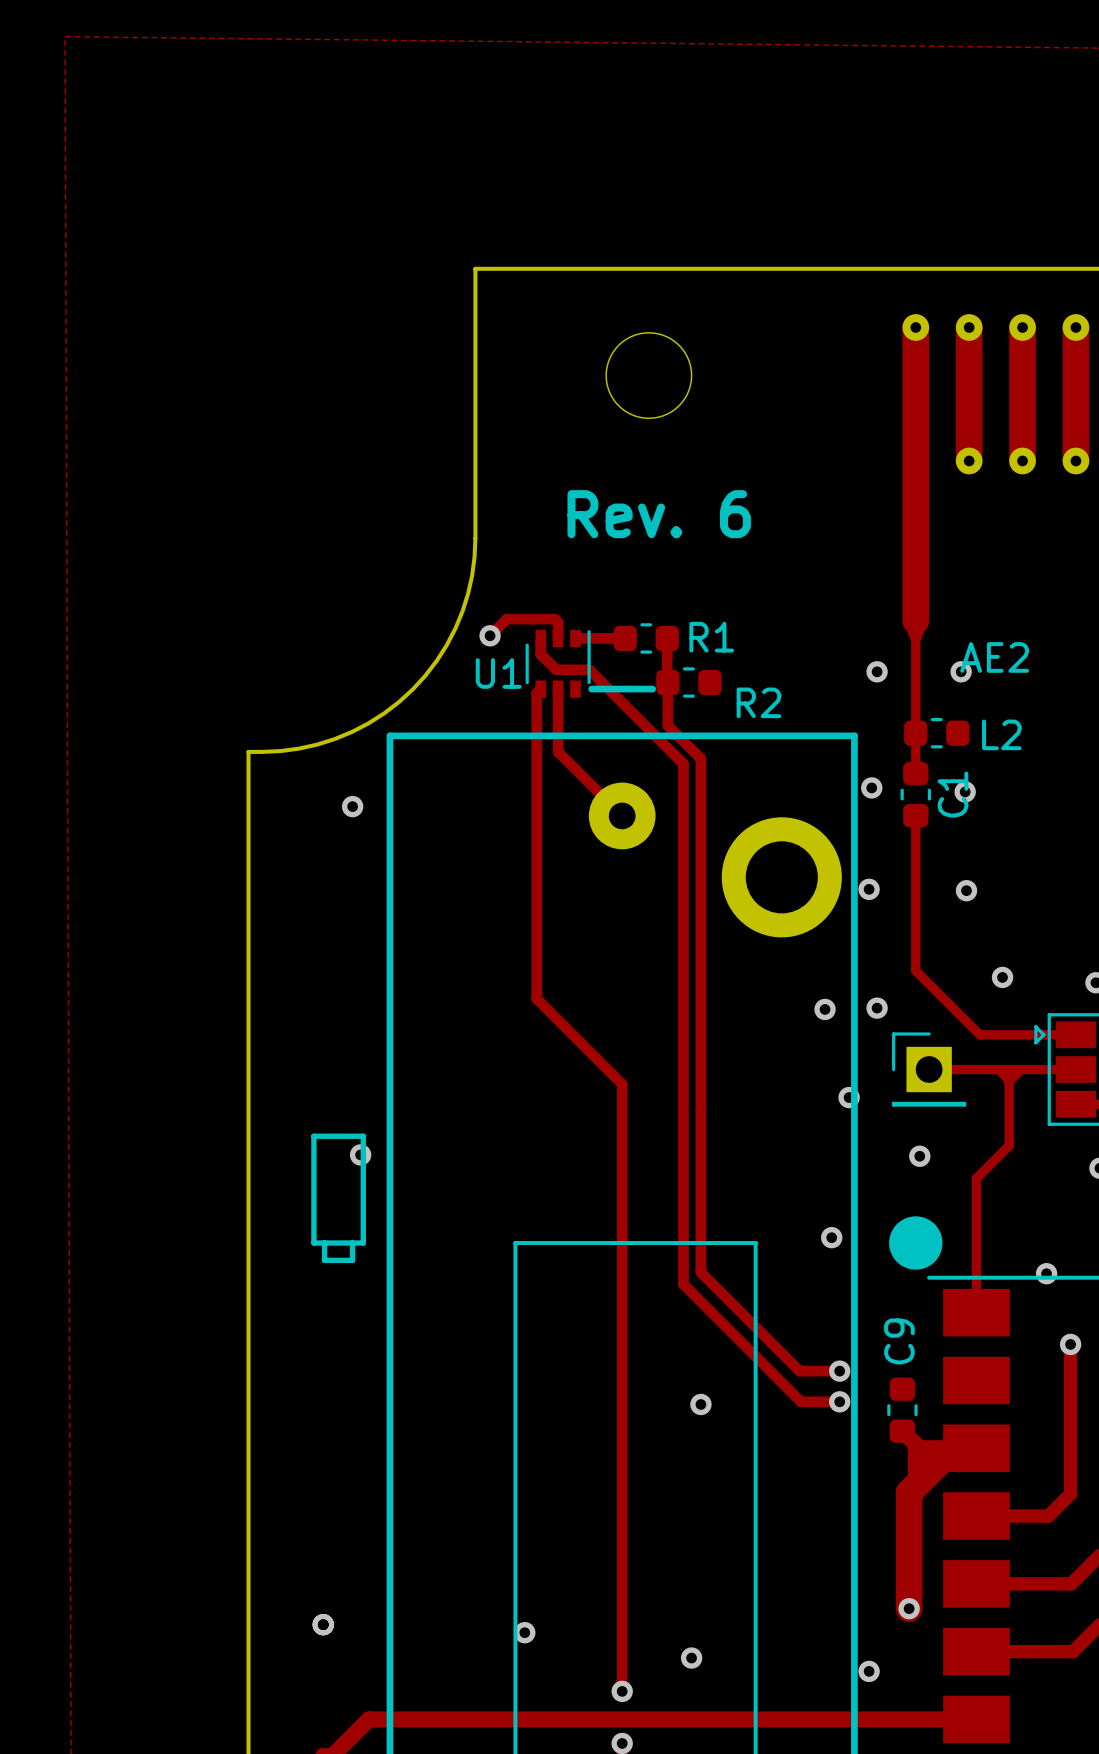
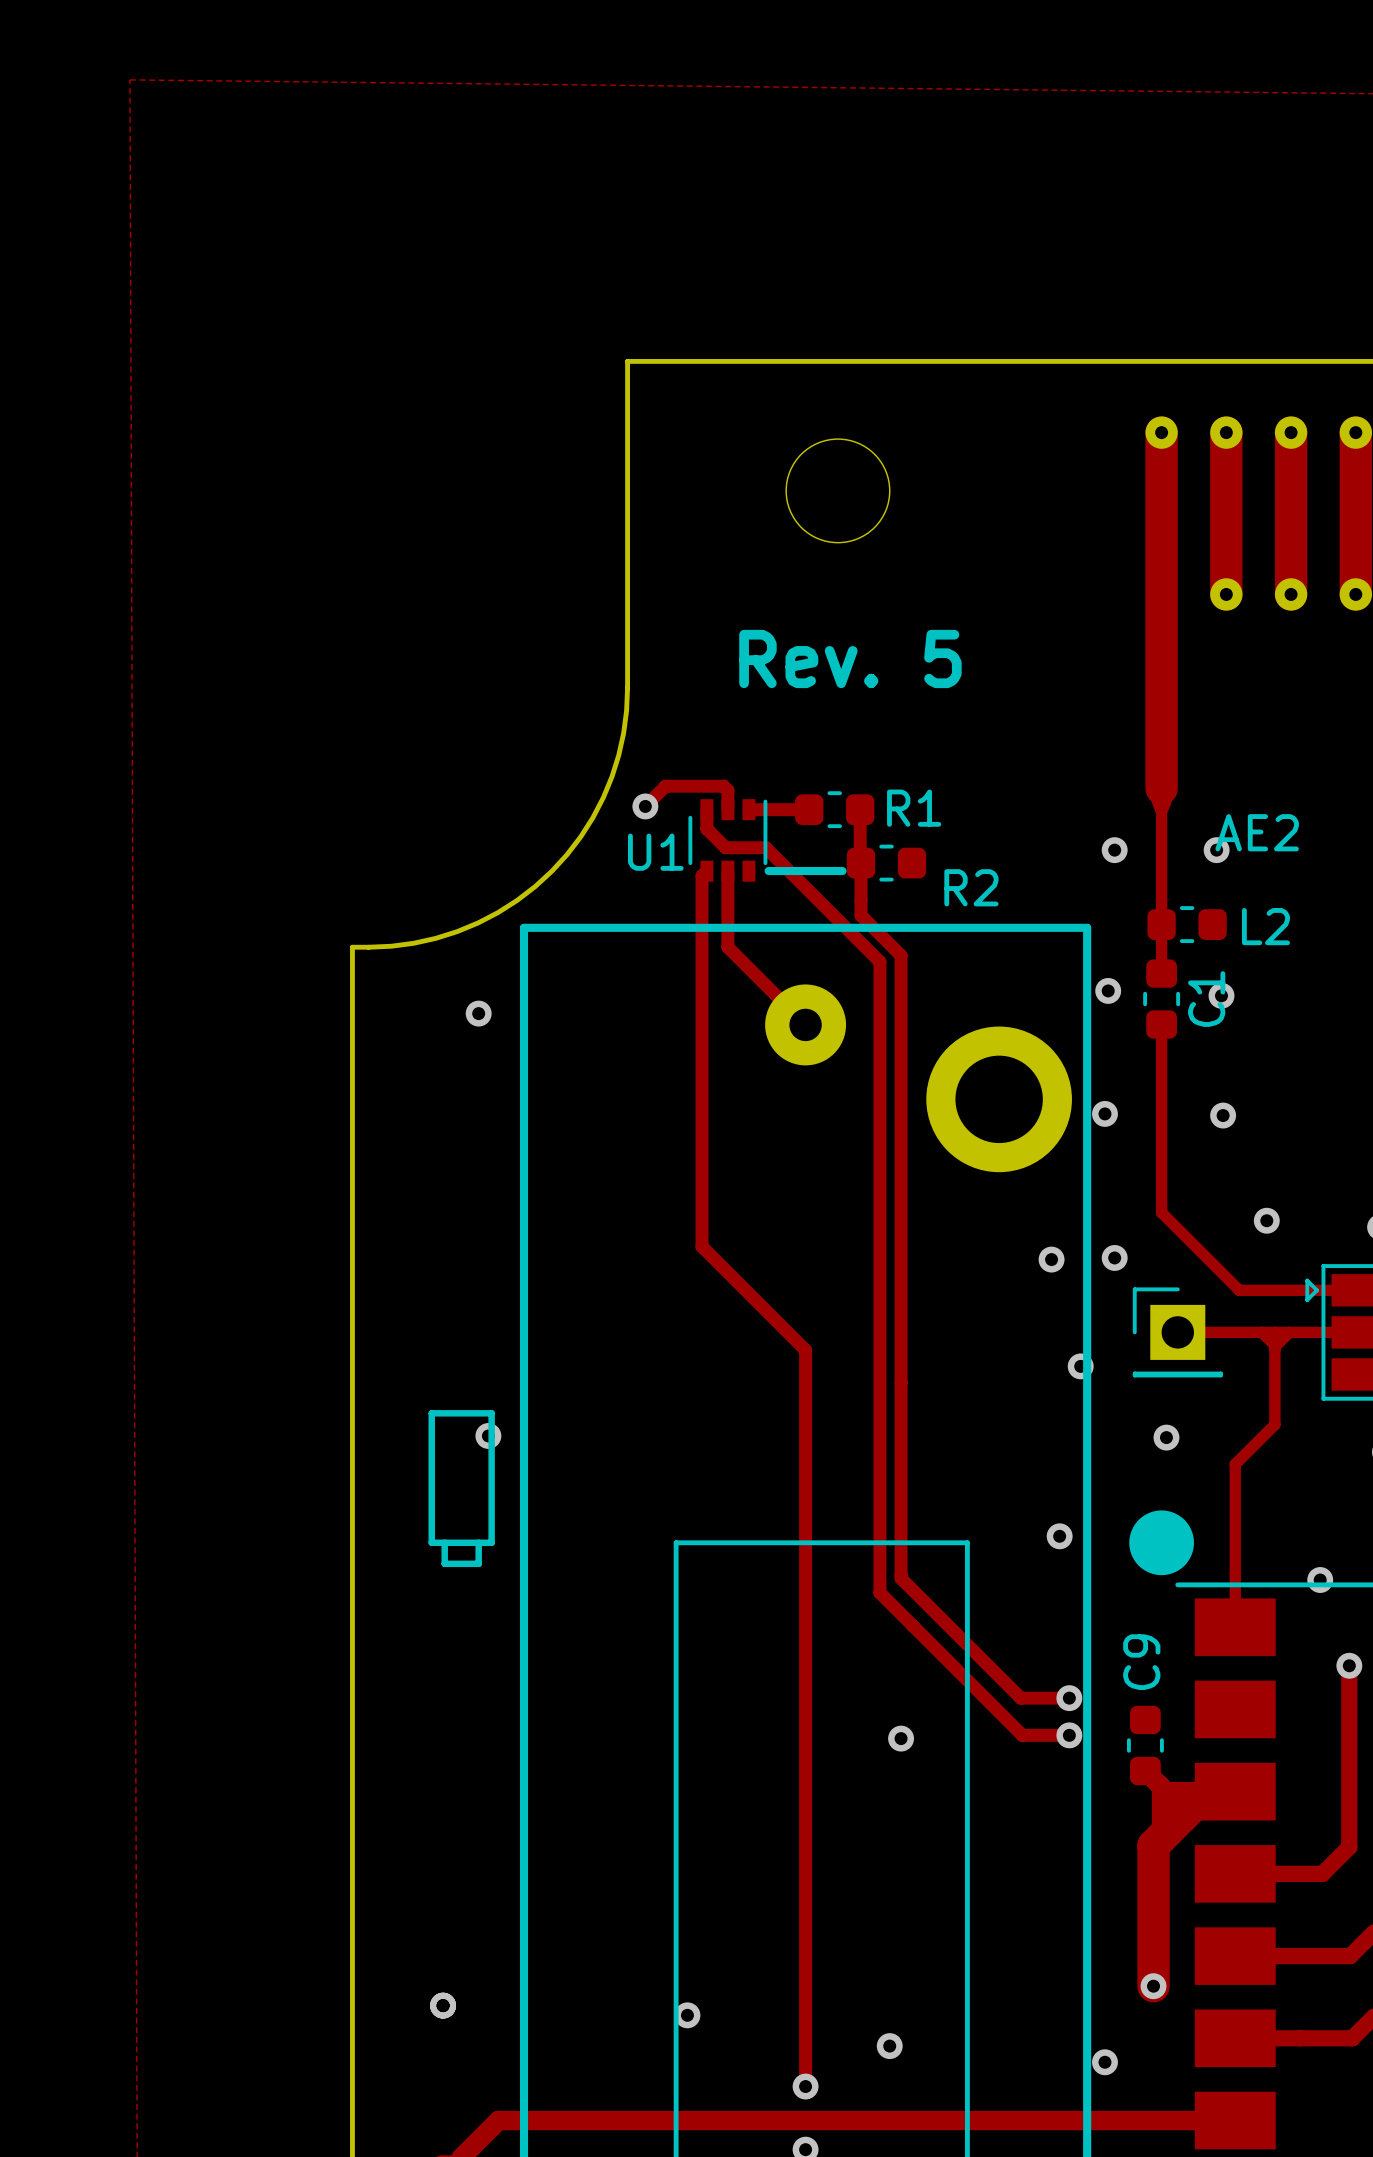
text: Rev. 6 (659, 514) -> Rev. 5 (850, 658)

